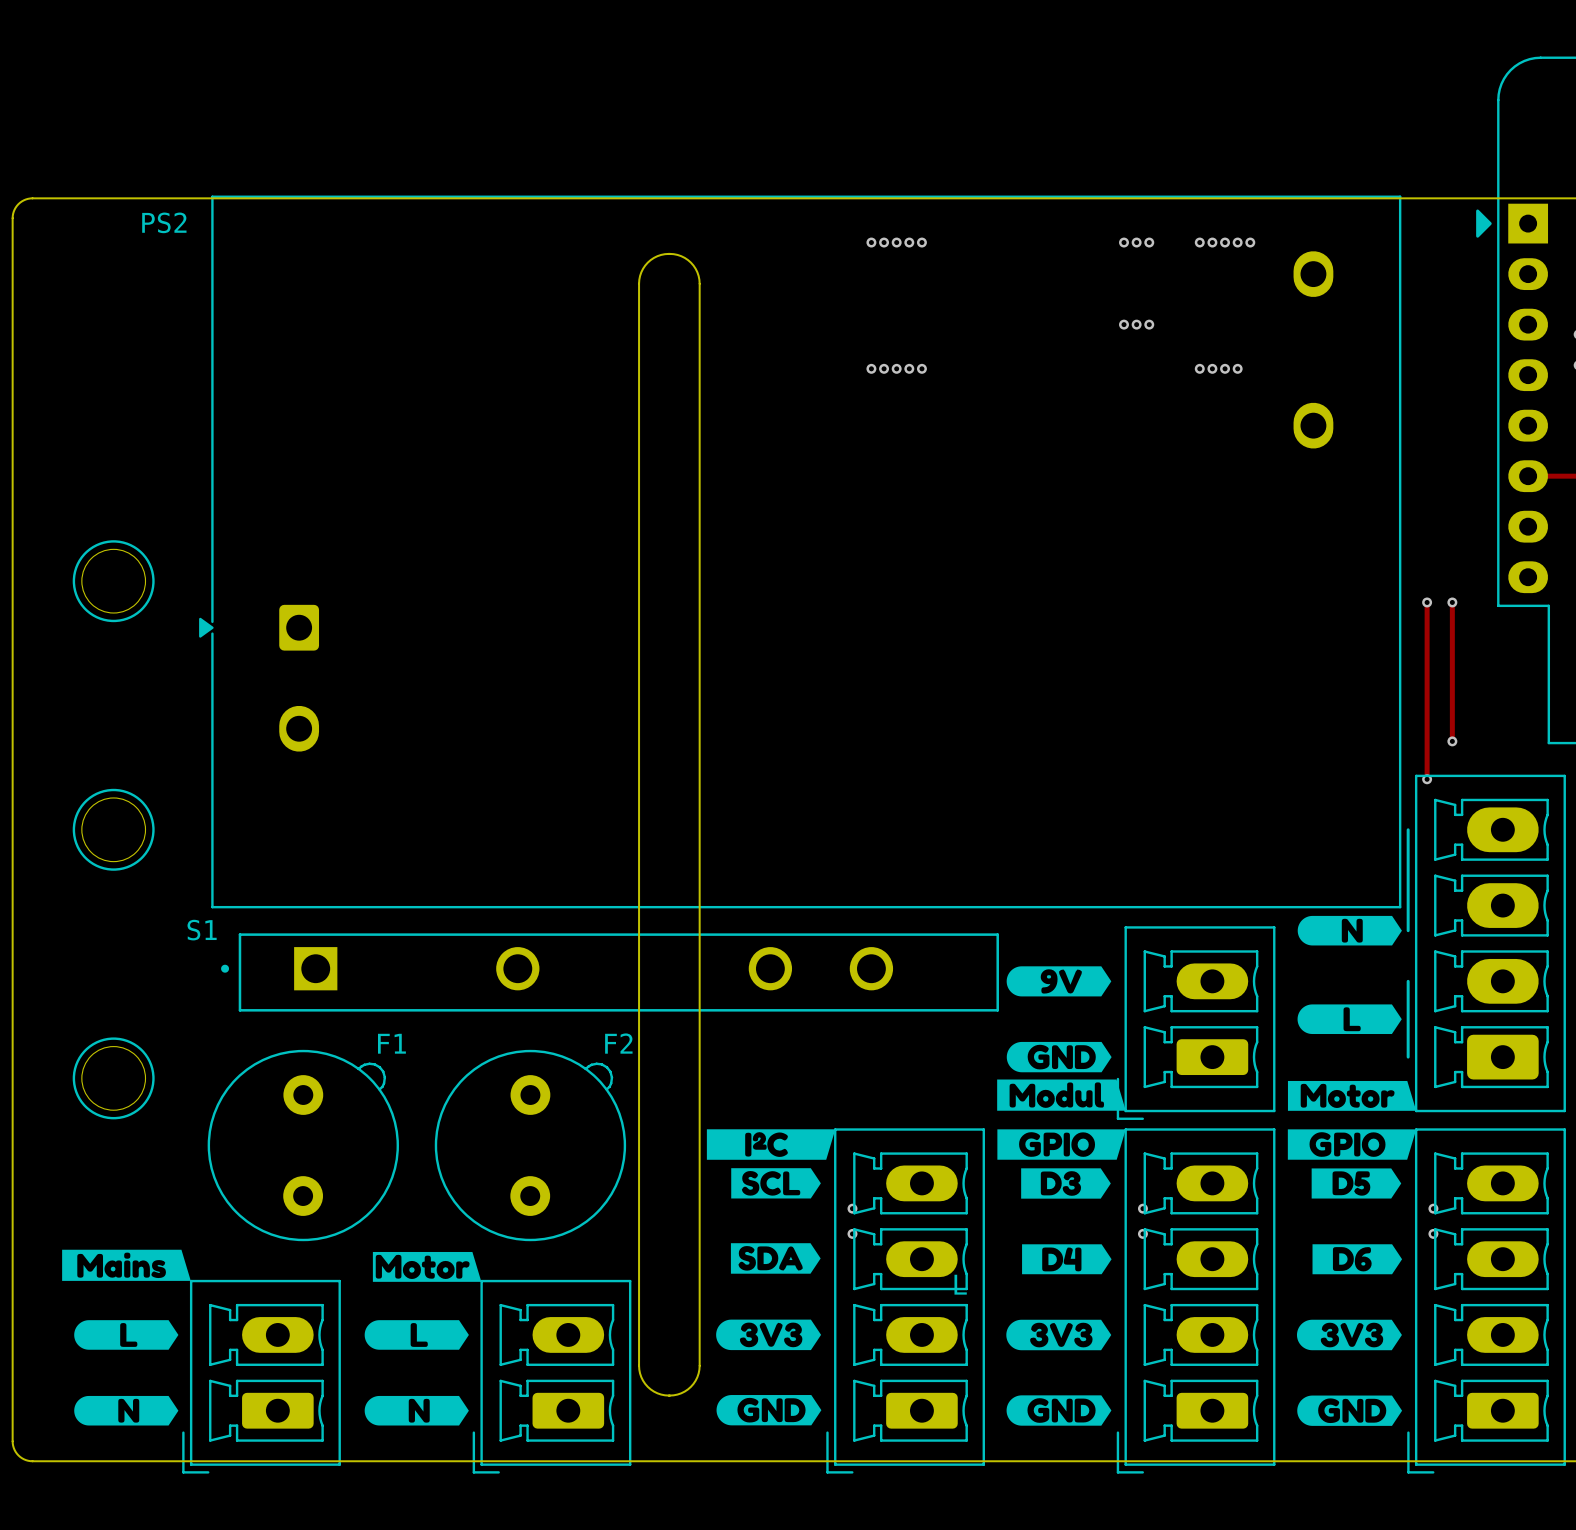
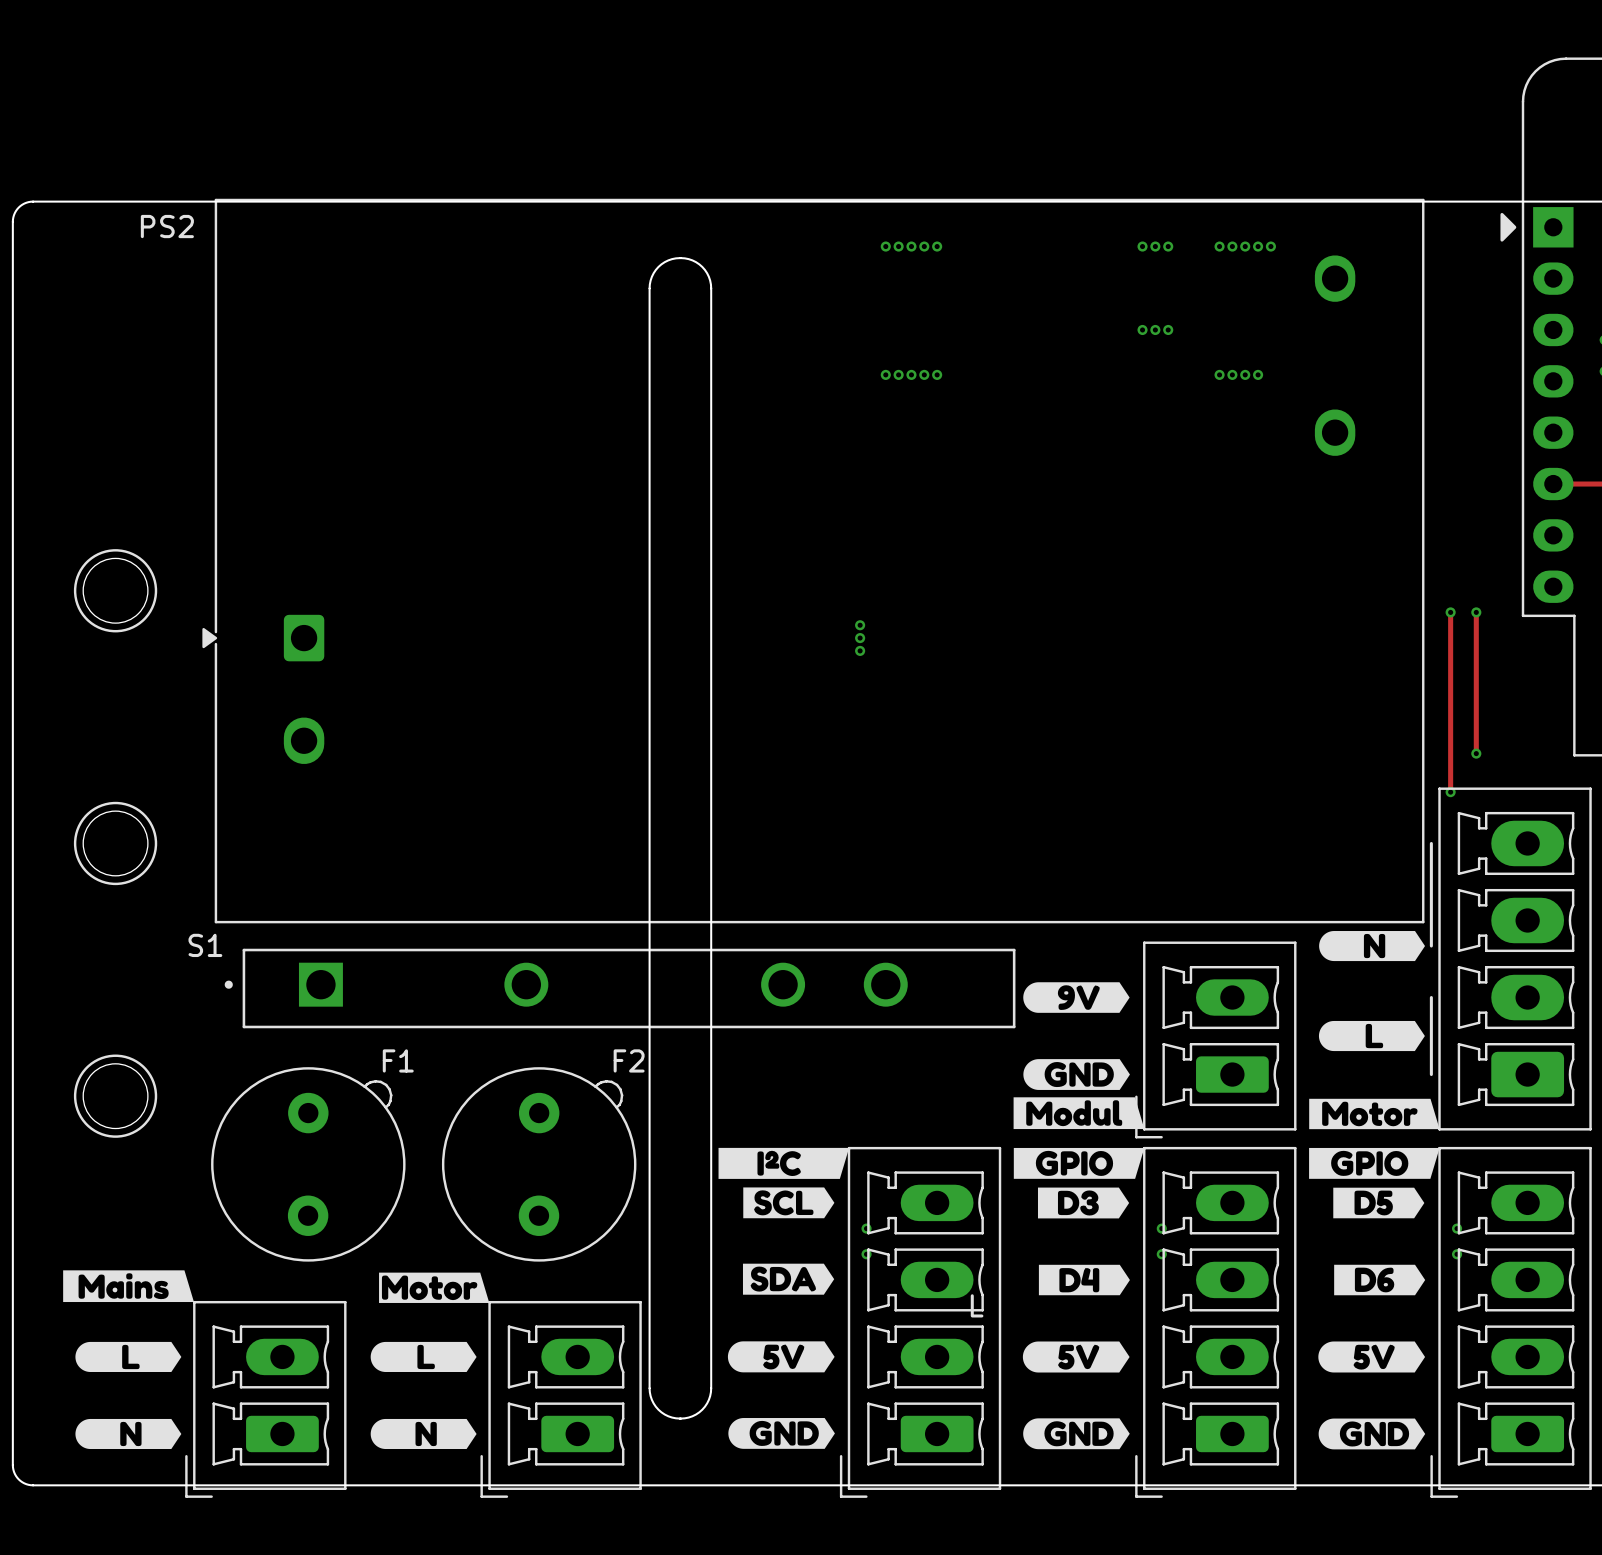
via: none -> (860, 625)
via: none -> (860, 638)
via: none -> (860, 650)
drawing shape: [716, 1319, 822, 1351] -> [727, 1341, 835, 1373]
drawing shape: [1006, 1319, 1112, 1351] -> [1022, 1341, 1130, 1373]
drawing shape: [1296, 1319, 1402, 1351] -> [1318, 1341, 1426, 1373]

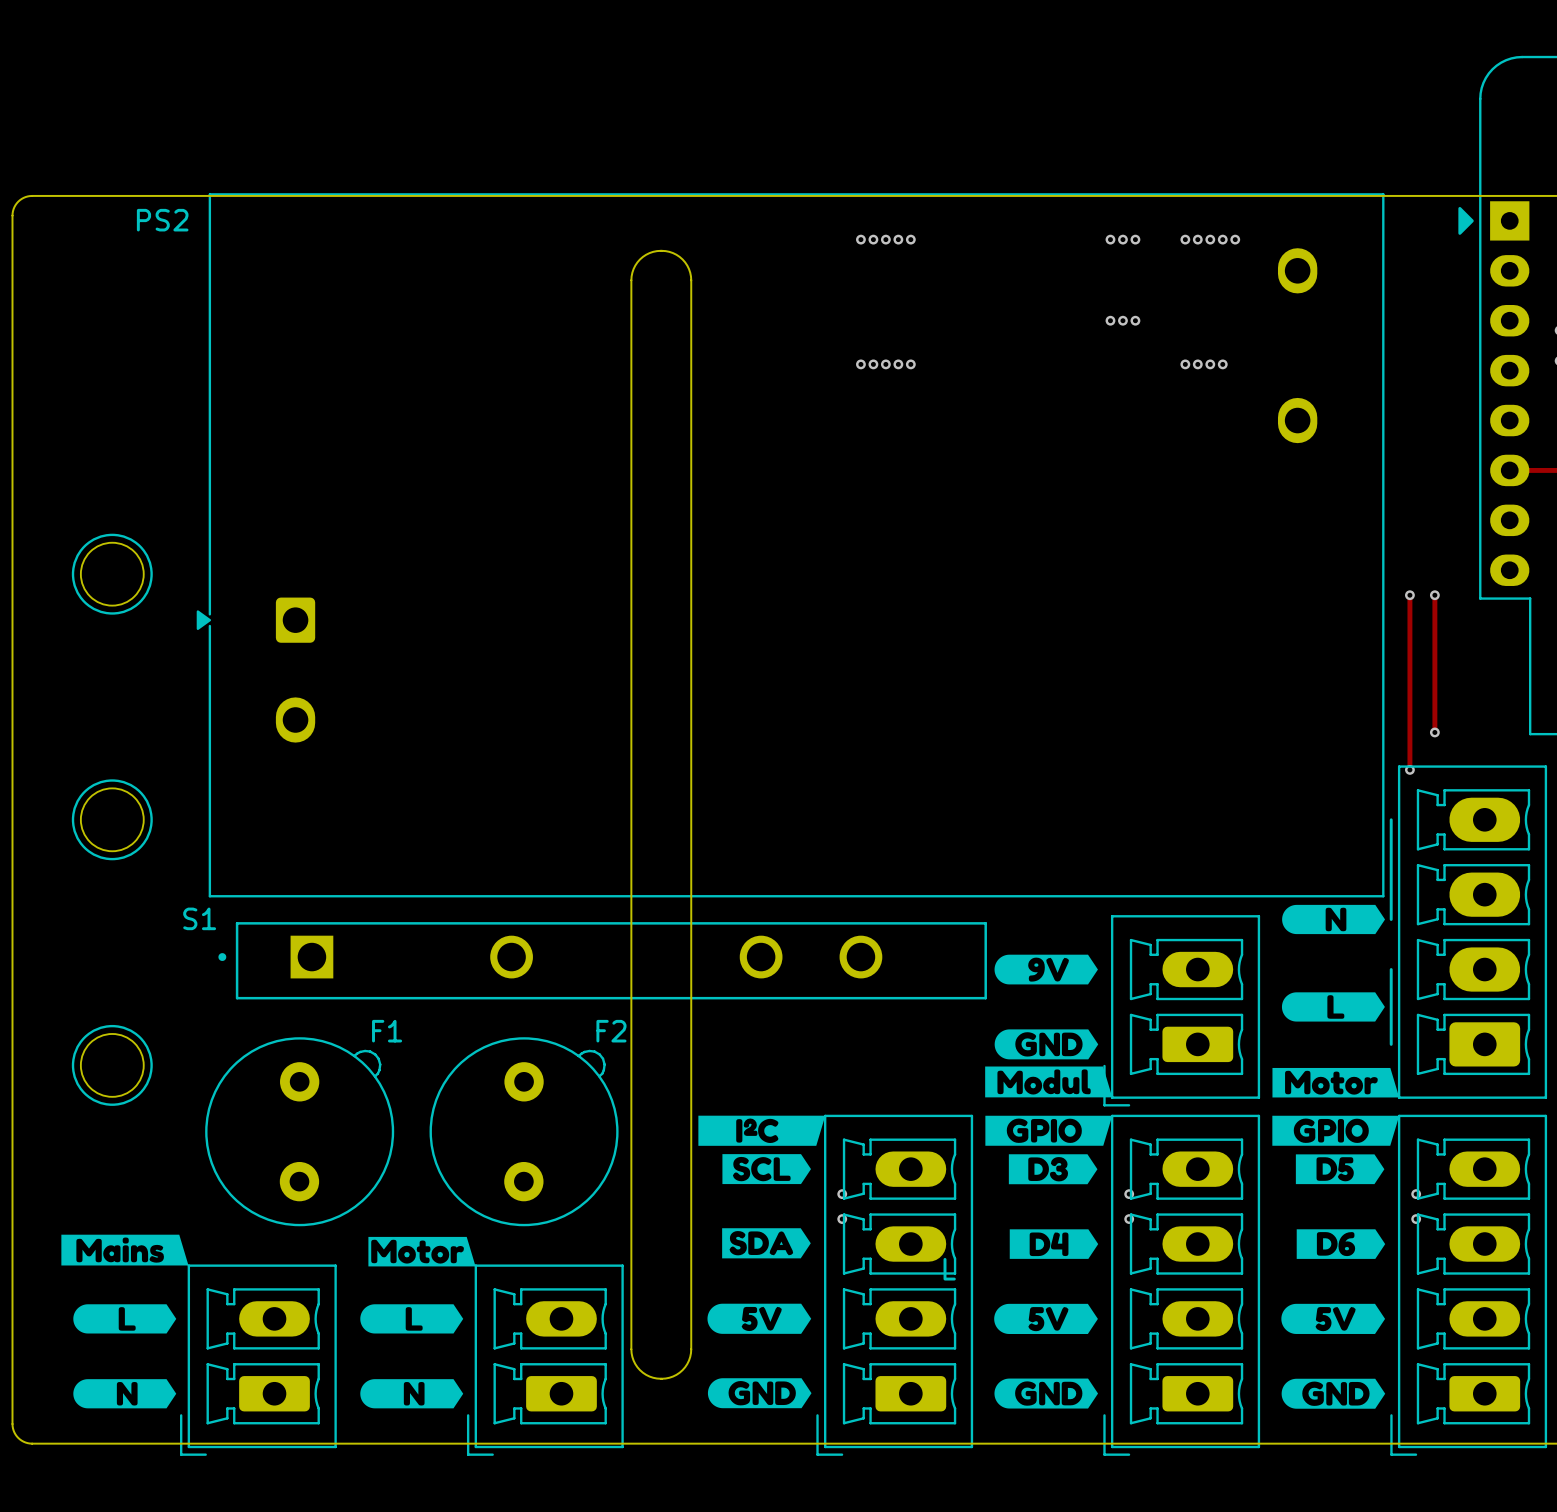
via: (860, 625) -> none
via: (860, 638) -> none
via: (860, 650) -> none

